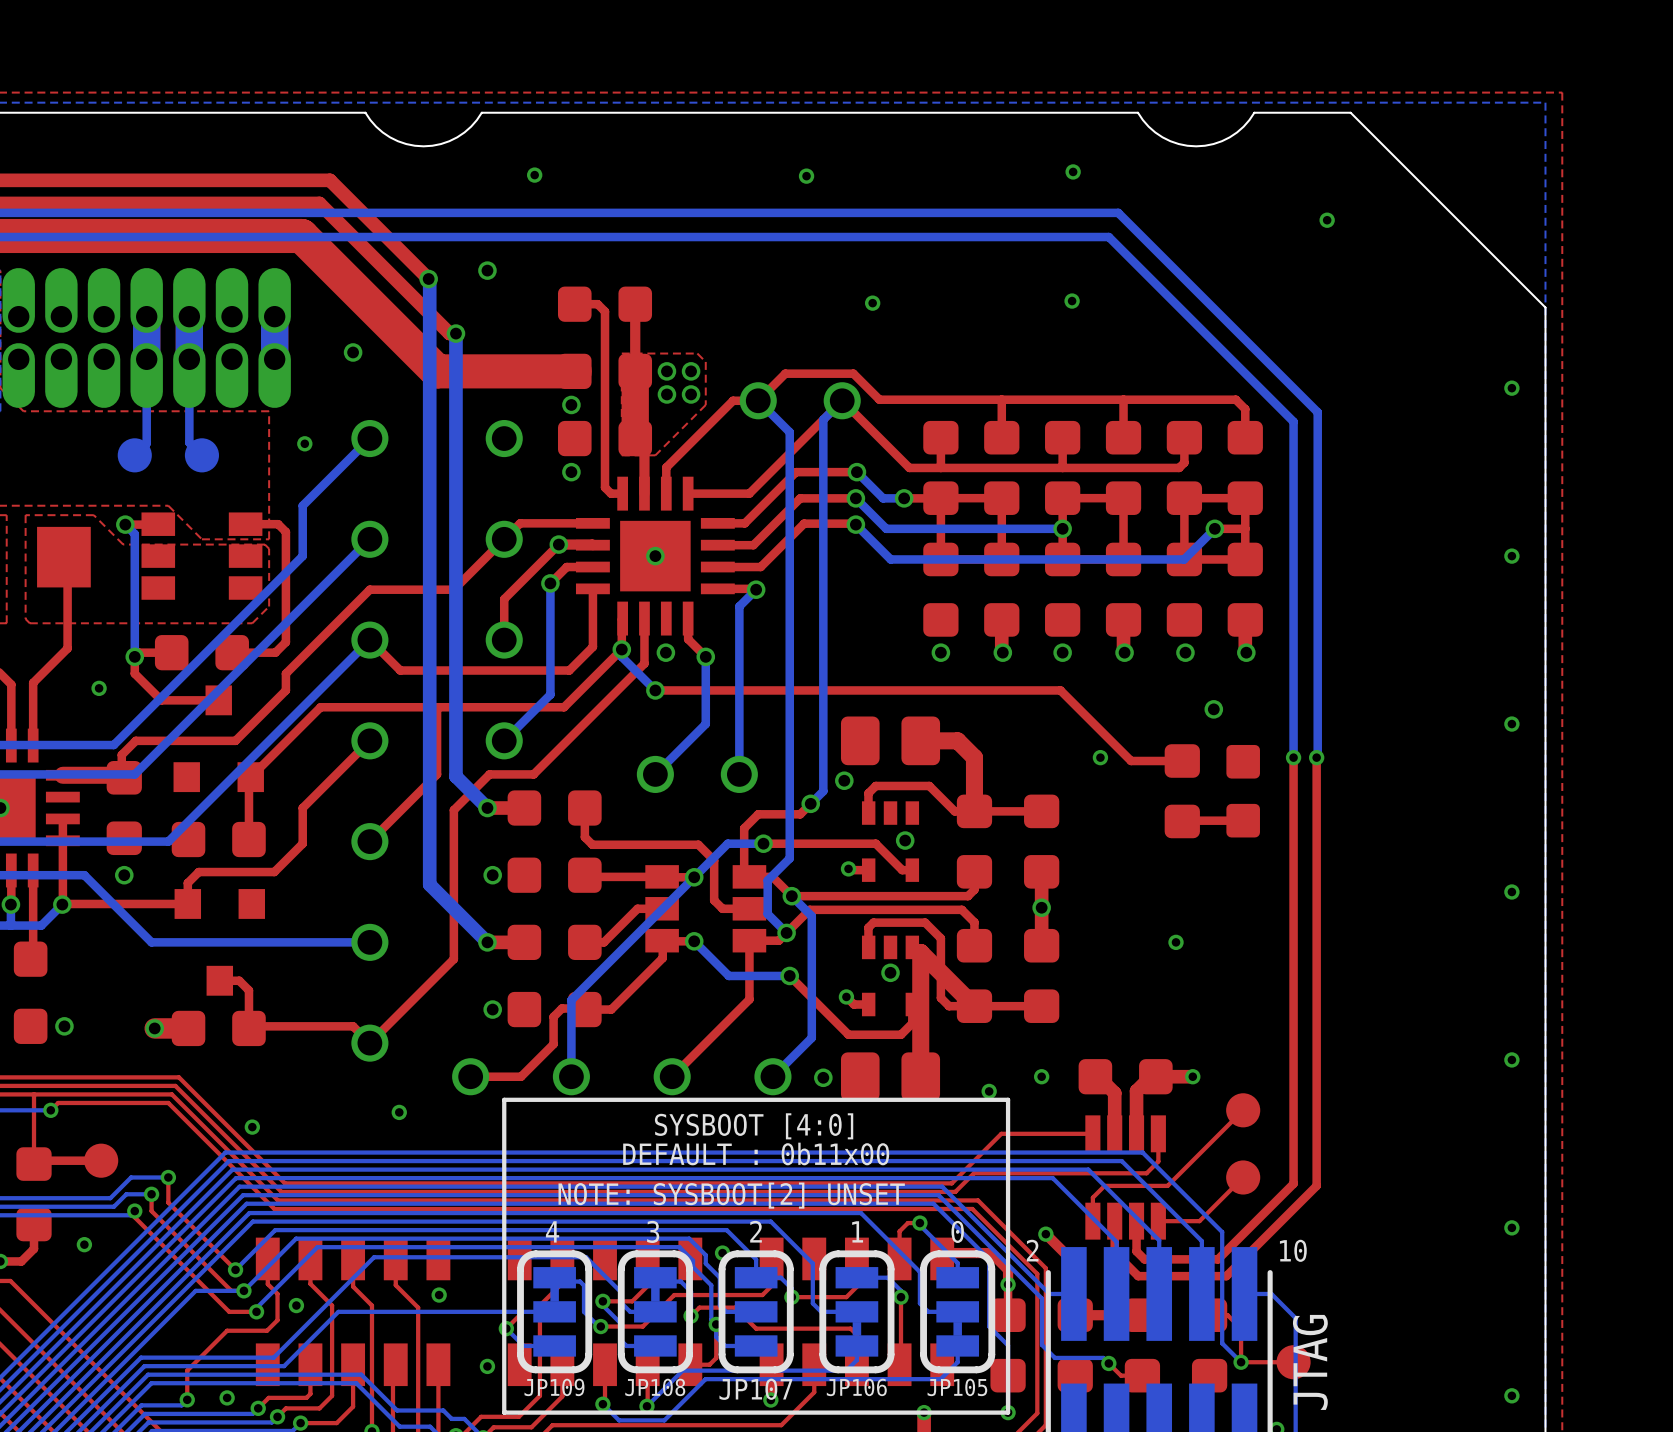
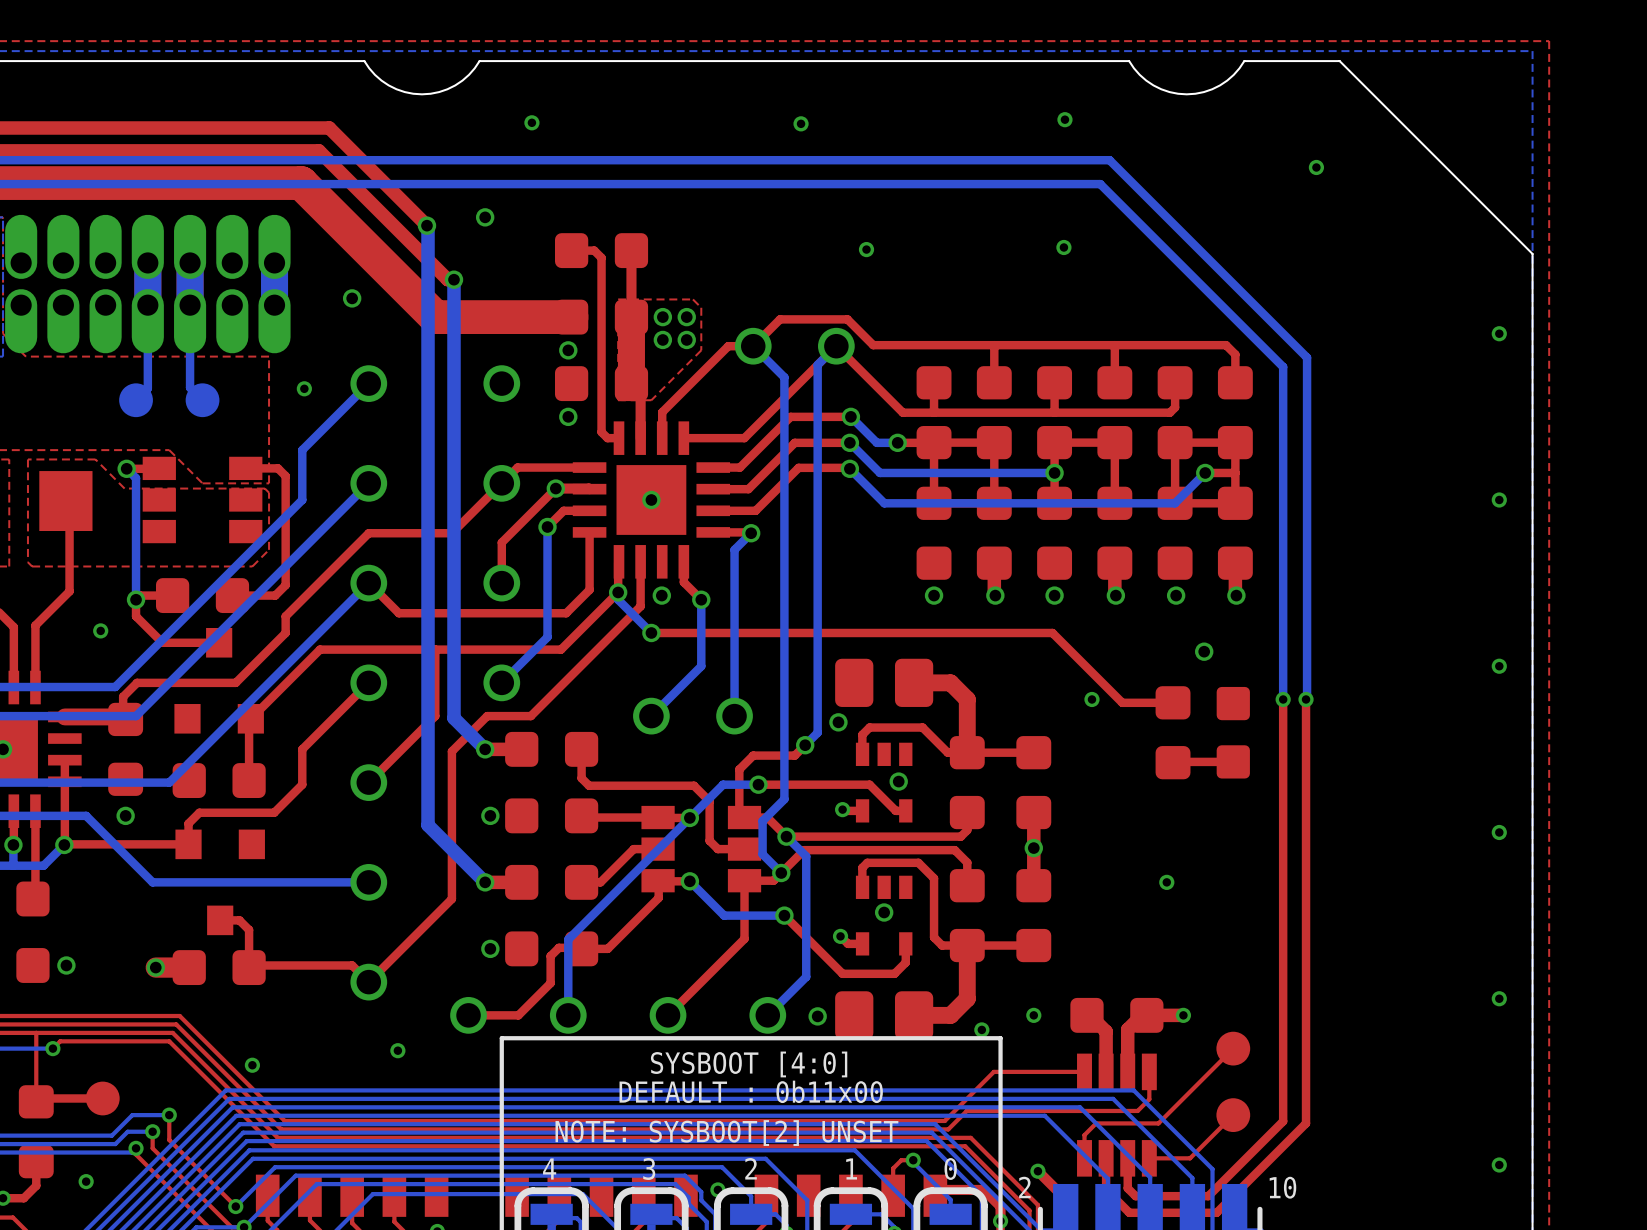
top track: (974, 1006) (920, 952) (920, 1076) -> (967, 945) (967, 998) (950, 1015) (914, 1015)

